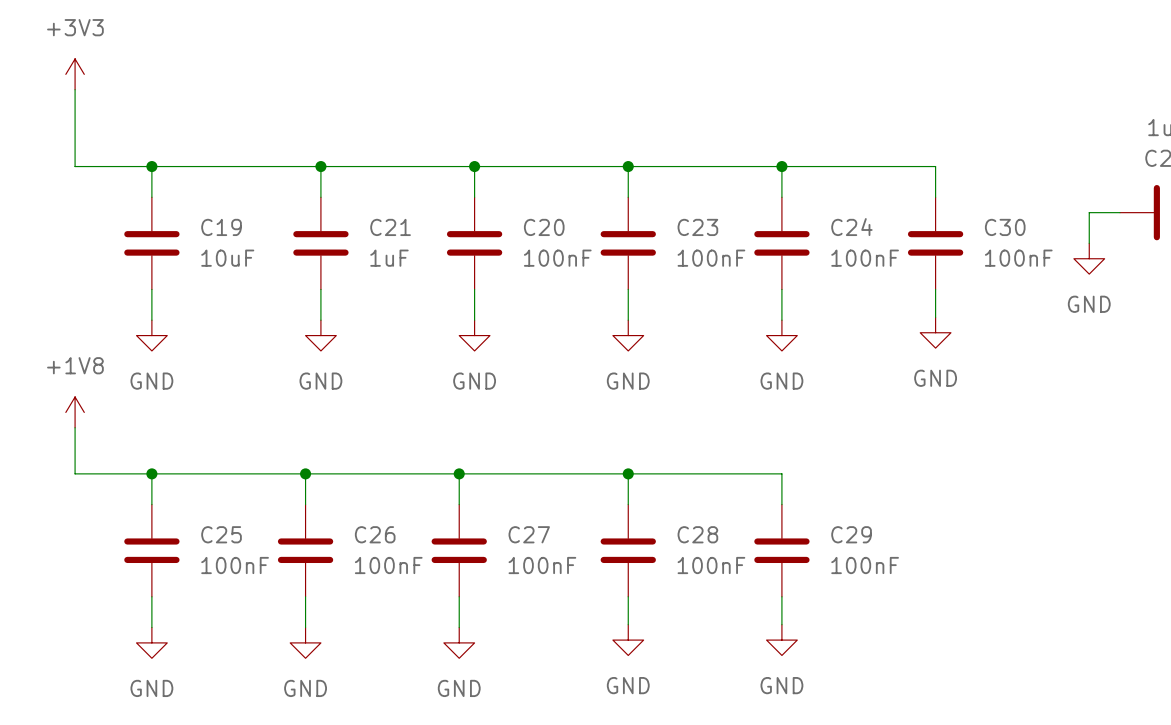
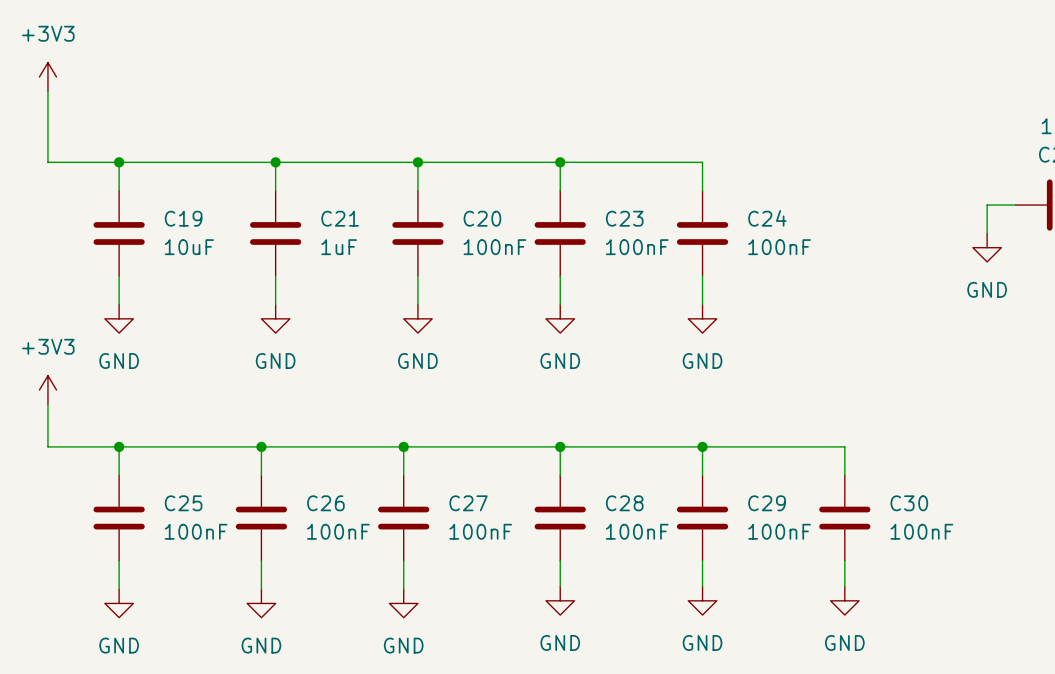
wire: (781, 166) (935, 166) (935, 197) -> none
junction: (781, 166) -> none
C30 position: (935, 243) -> (844, 518)
wire: (935, 289) (935, 317) -> none
power symbol: GND (935, 332) -> none
power symbol: +1V8 (75, 412) -> +3V3 (47, 390)
wire: none -> (702, 446) (844, 446) (844, 475)
junction: none -> (702, 446)
wire: none -> (844, 560) (844, 586)
power symbol: none -> GND (844, 600)

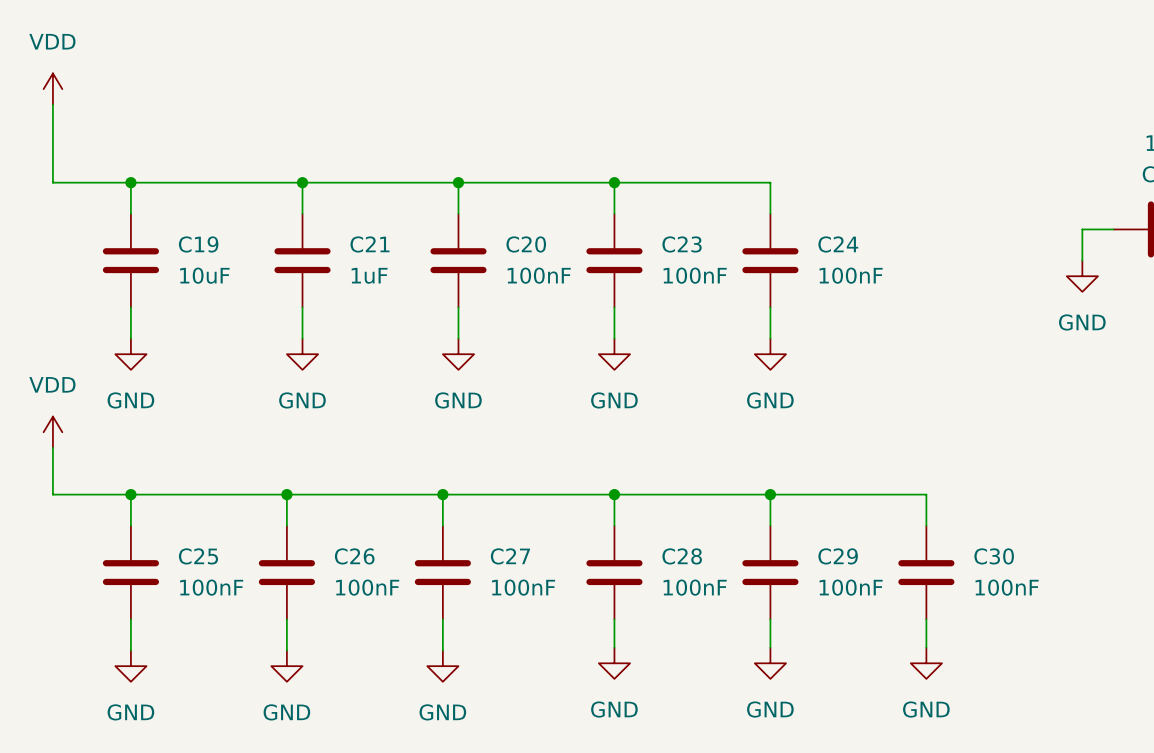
power symbol: +3V3 (47, 76) -> VDD (52, 89)
power symbol: +3V3 (47, 390) -> VDD (52, 432)

